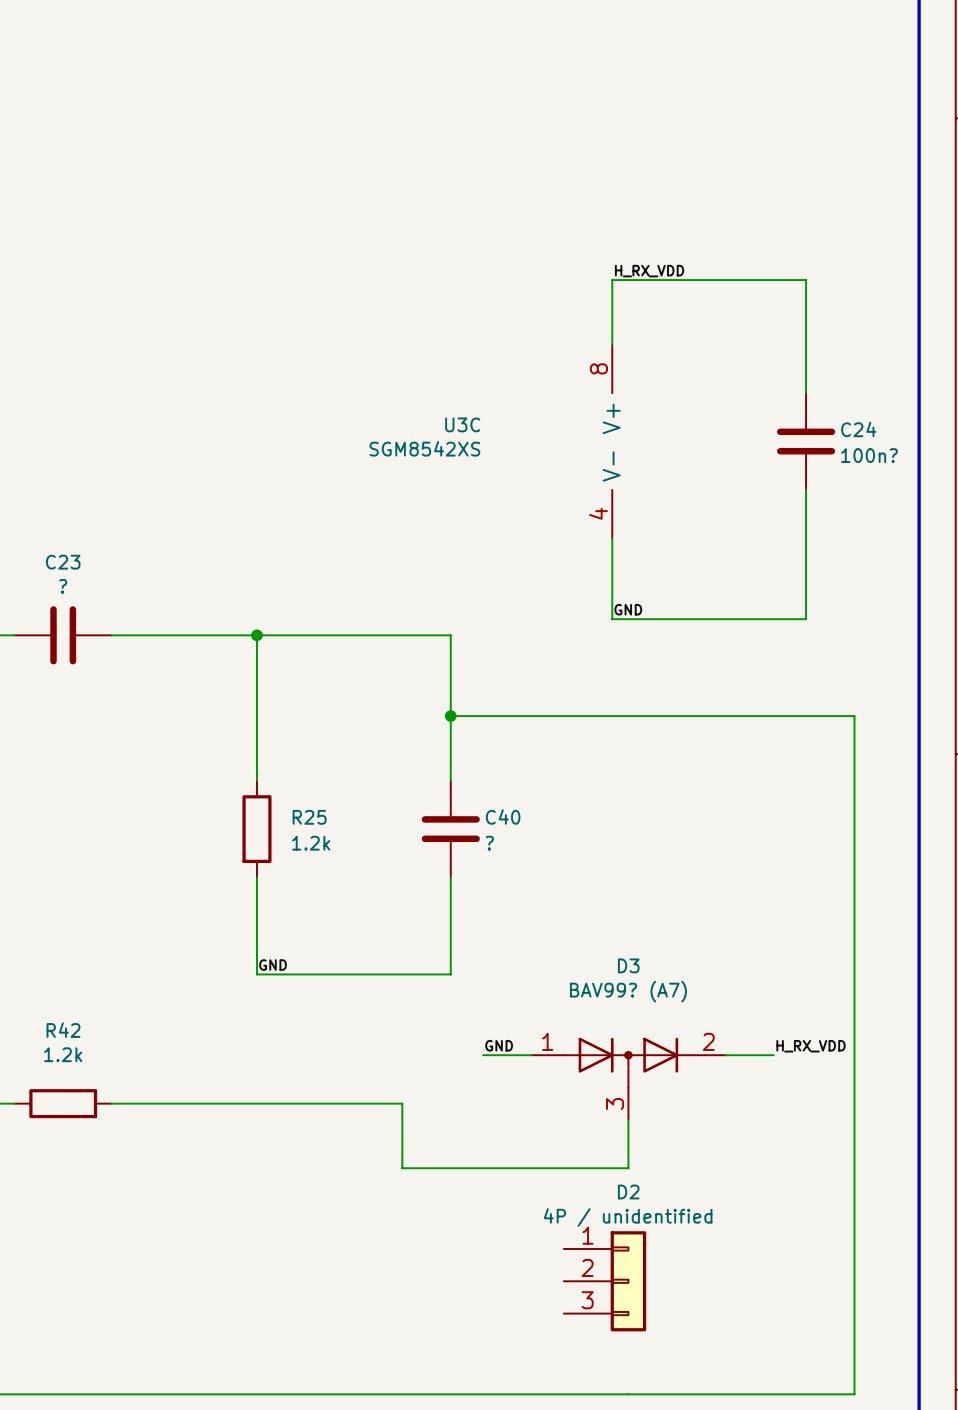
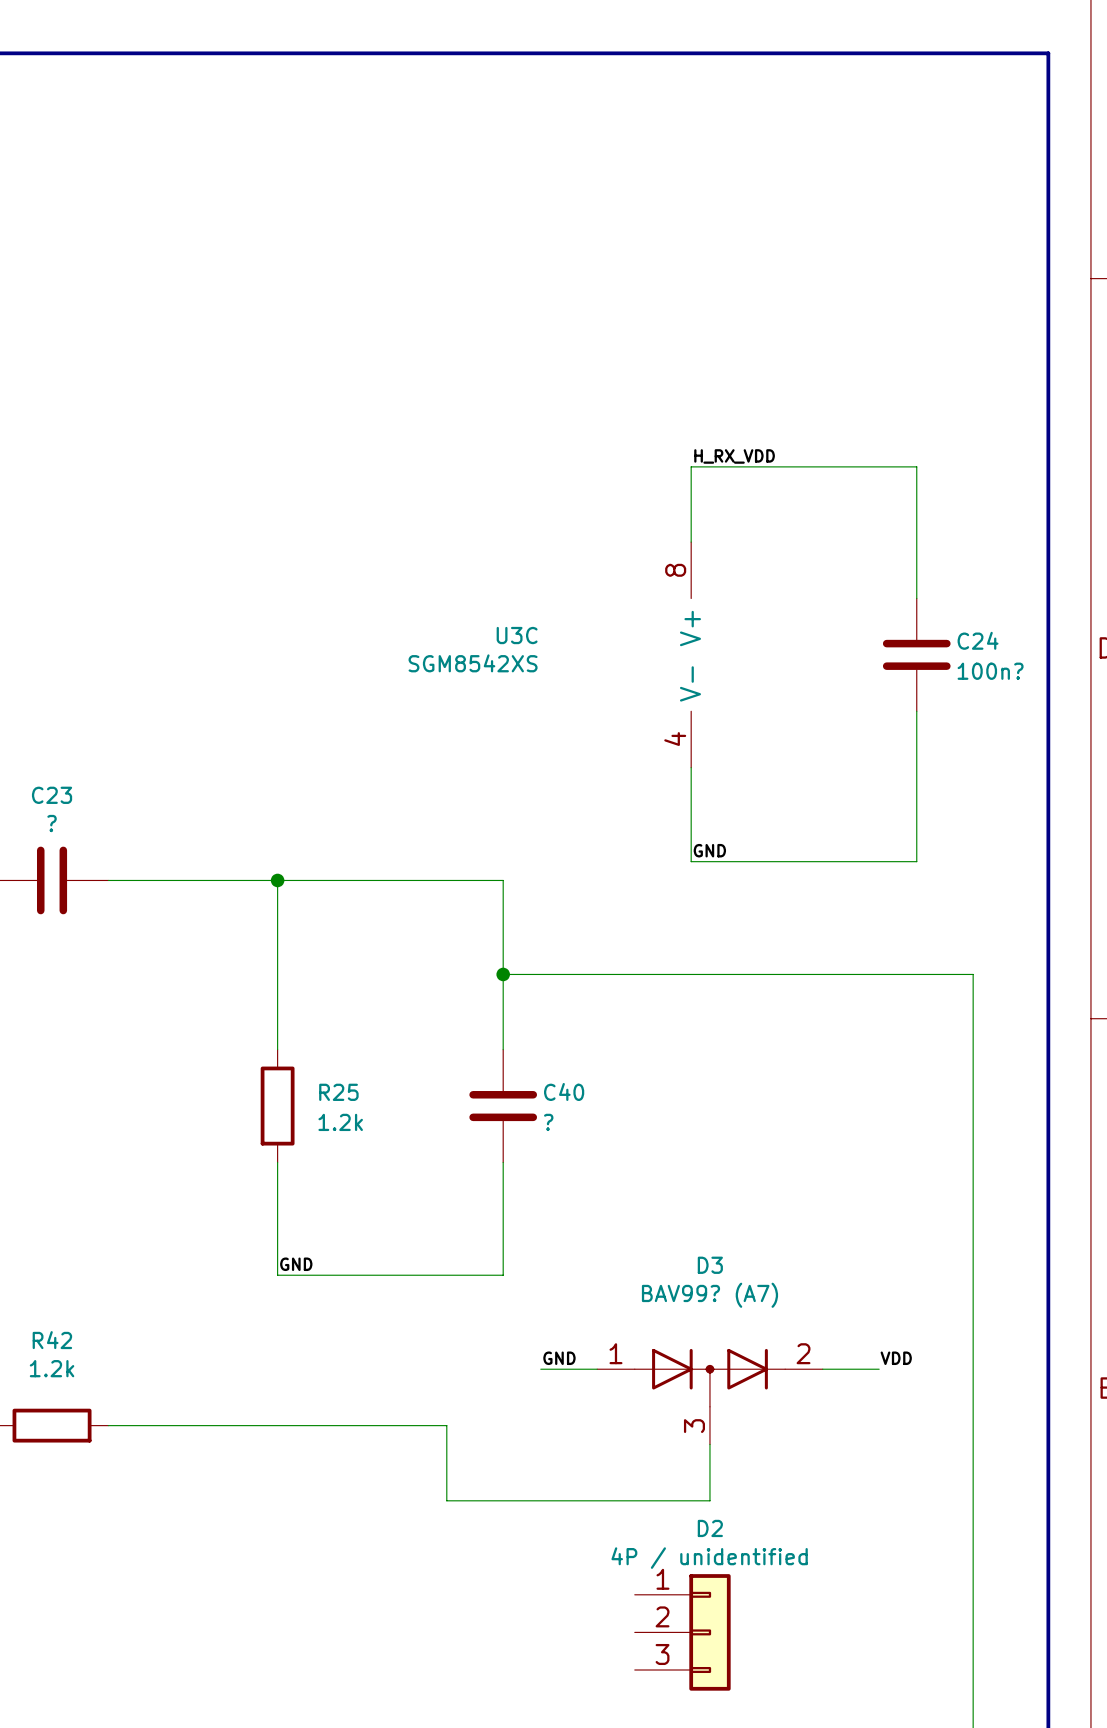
label: H_RX_VDD (811, 1046) -> VDD (896, 1358)

